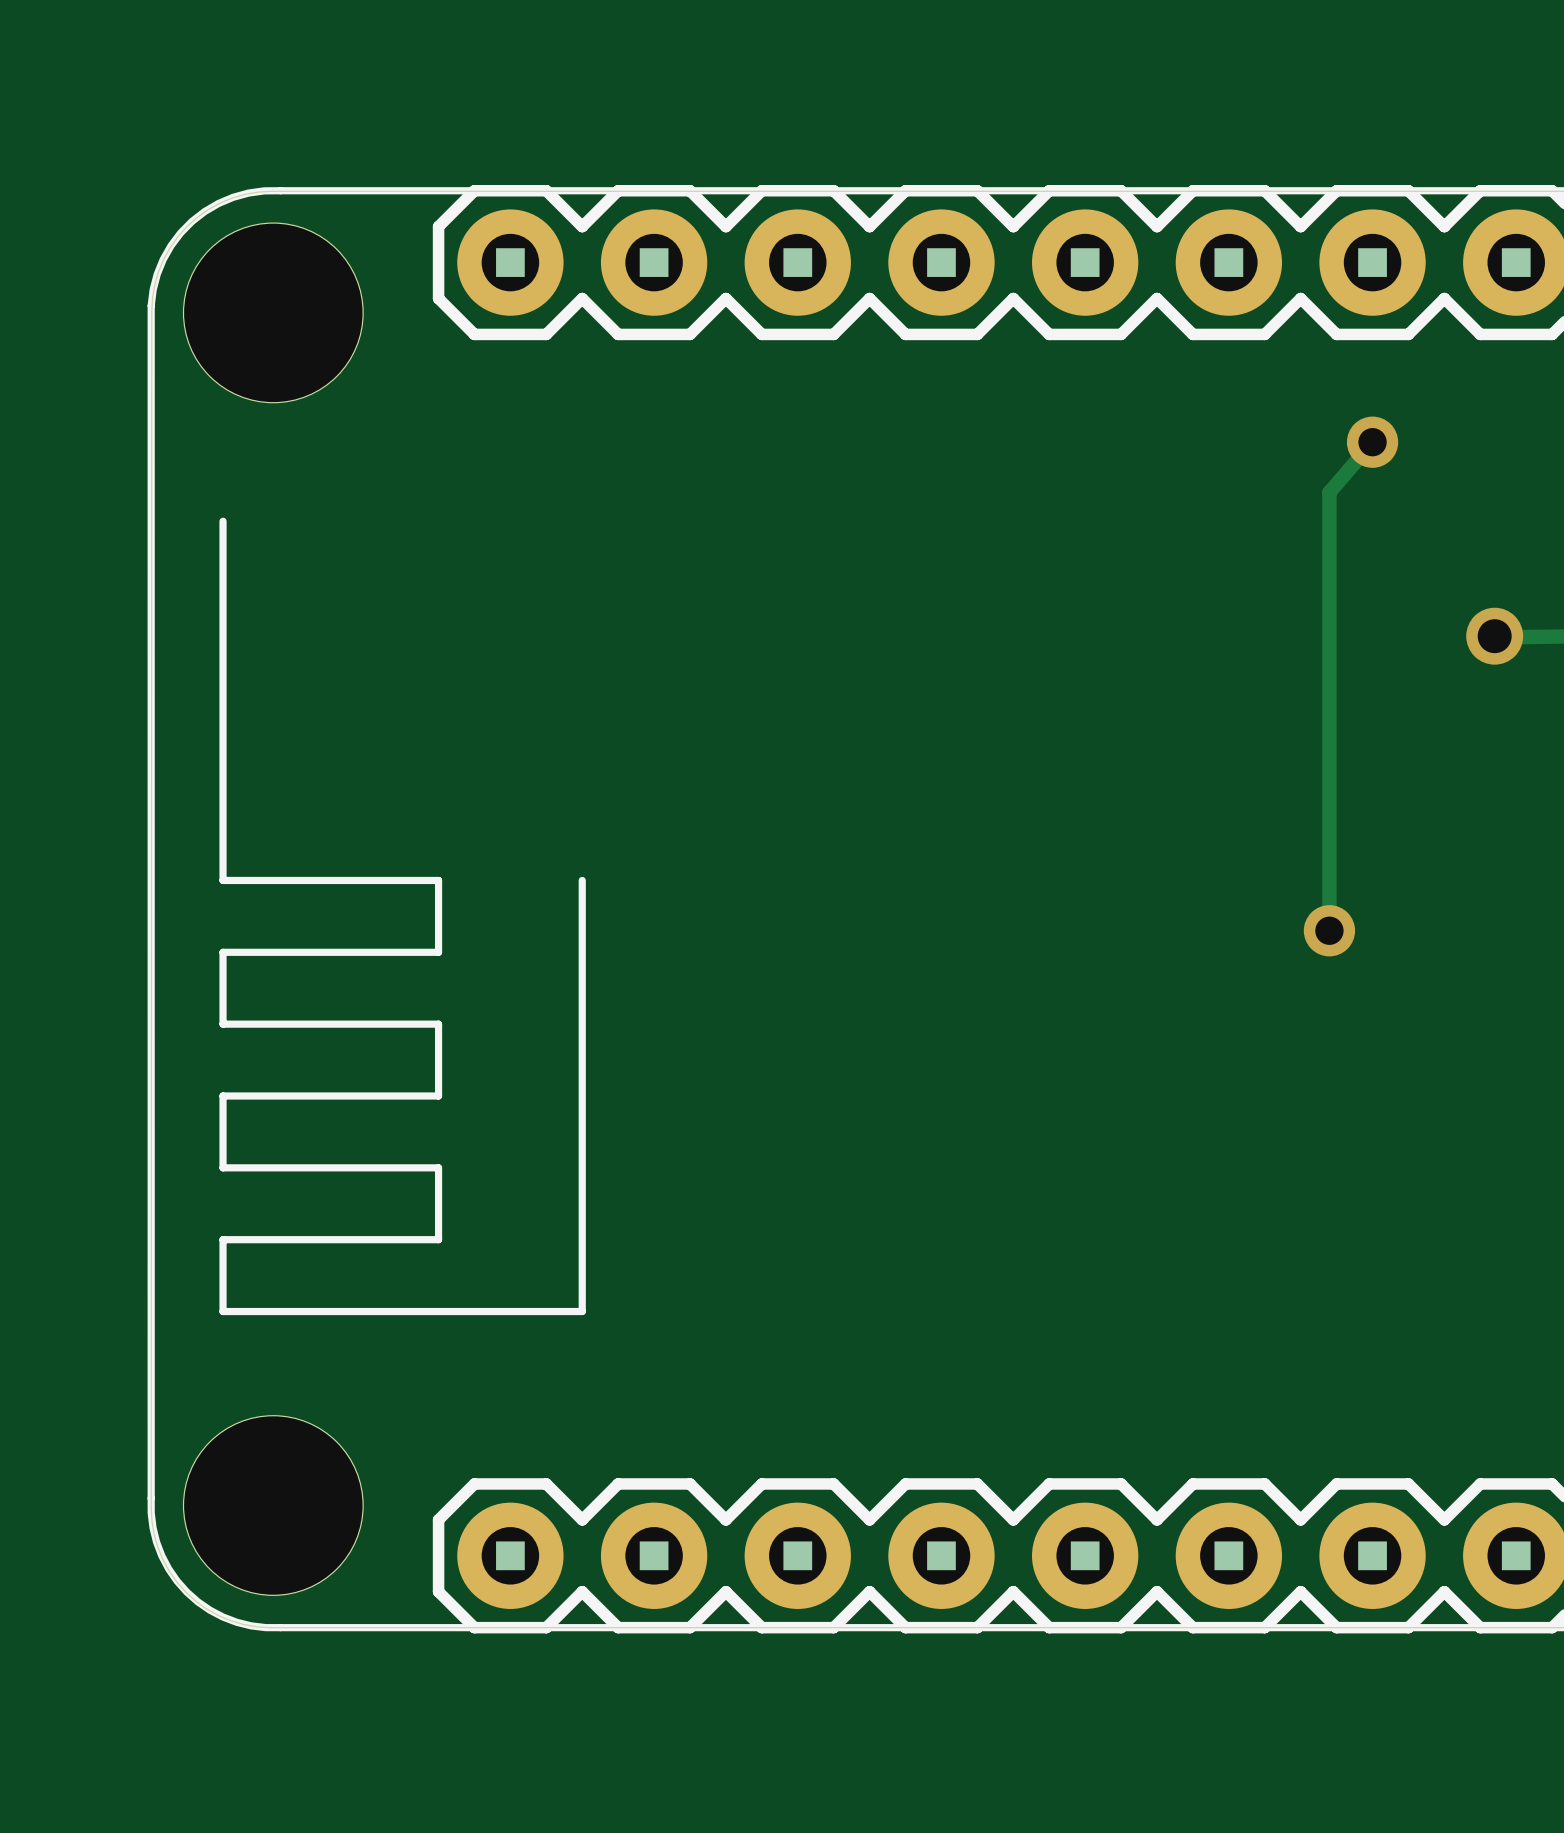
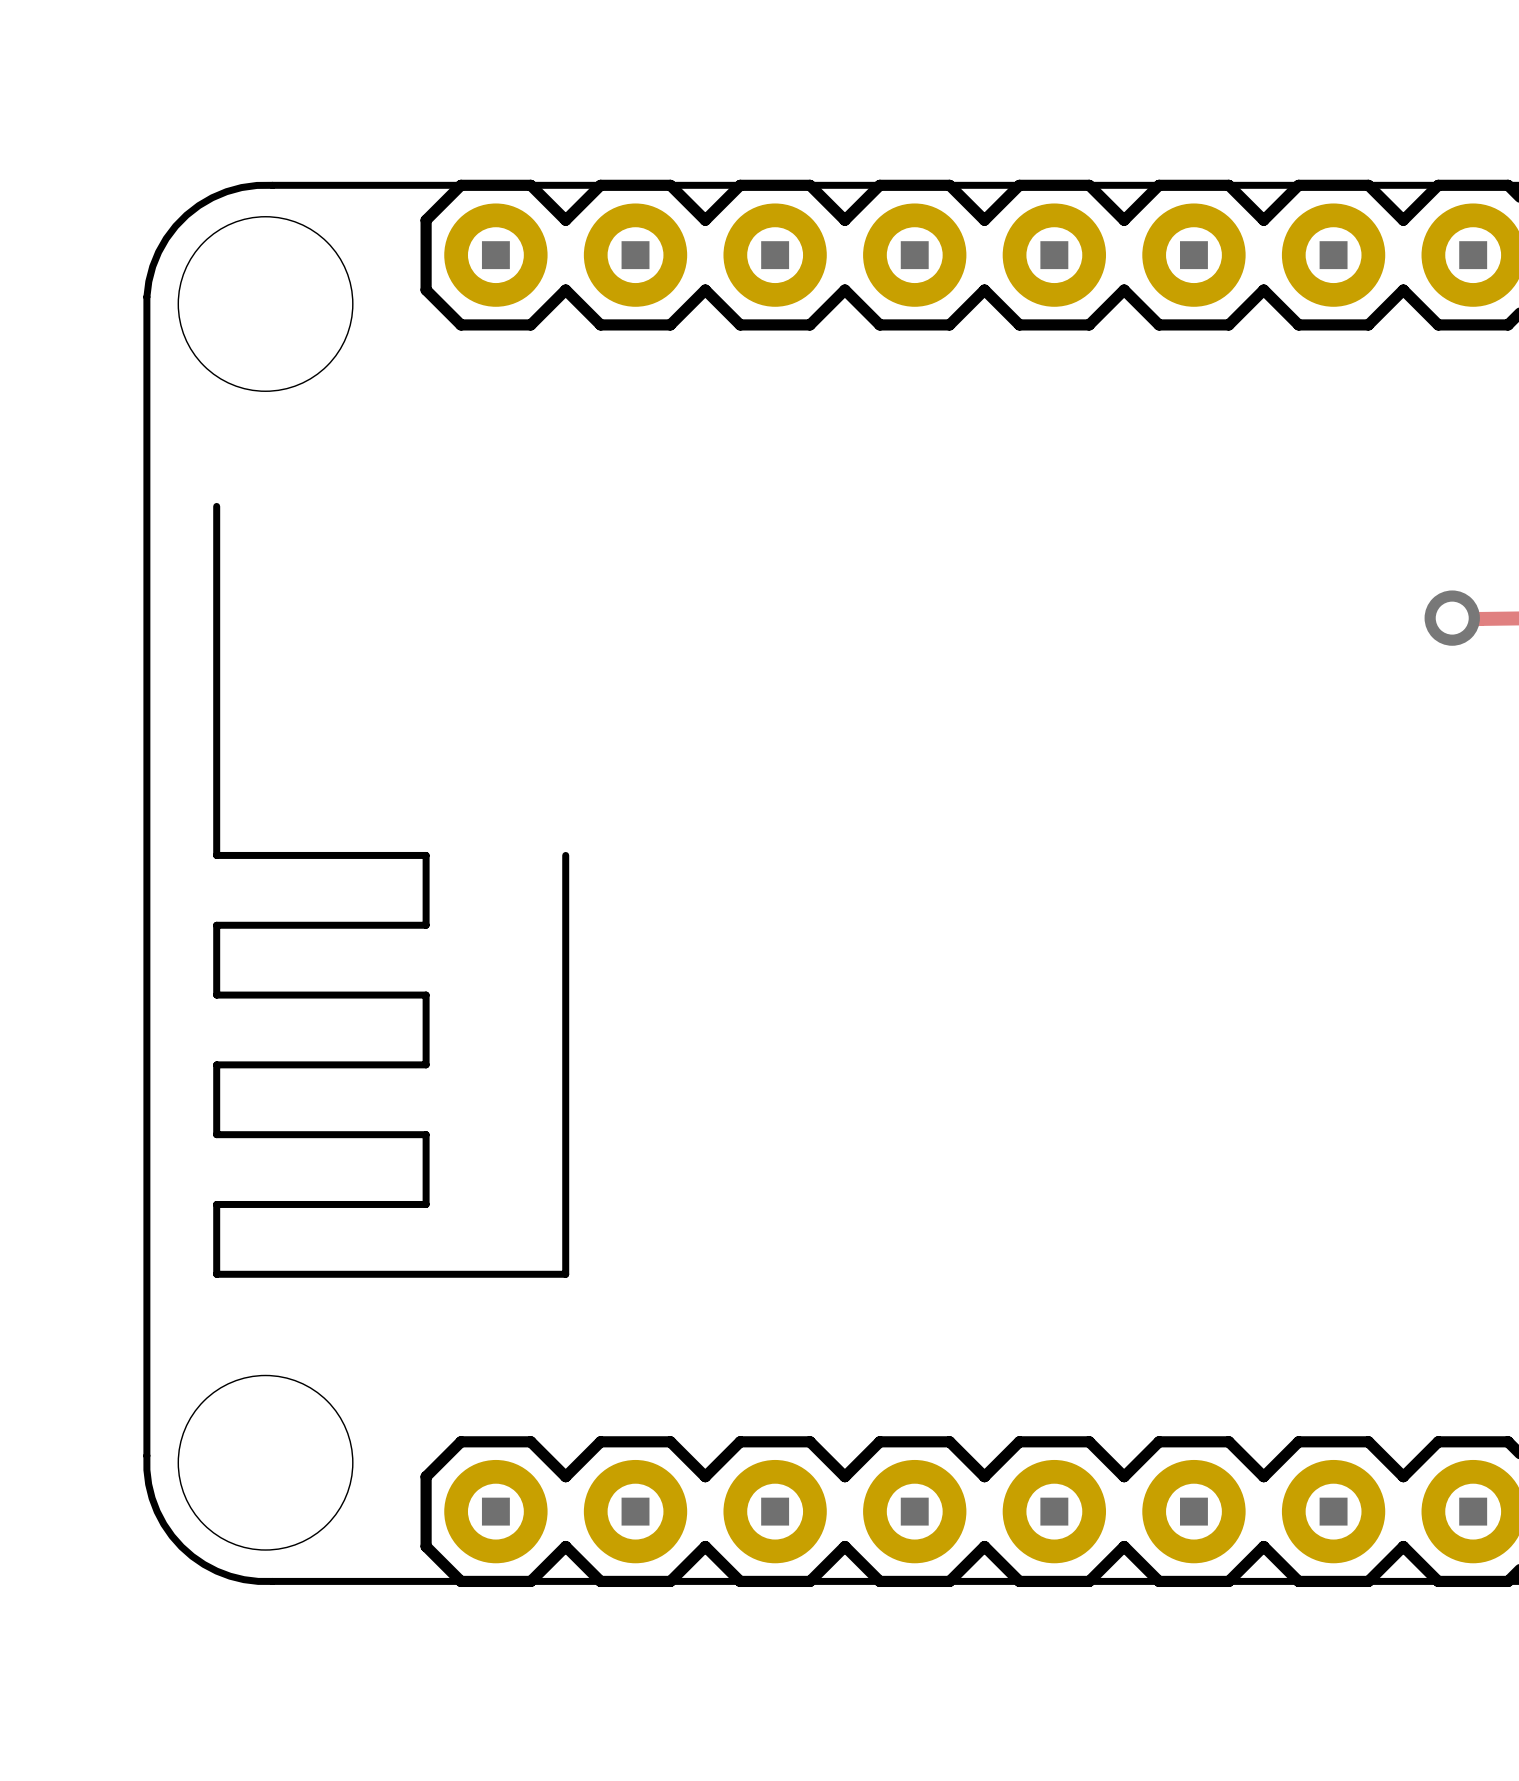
track: (1372, 442) (1329, 492) (1329, 930) -> none
via: (1372, 442) -> none
via: (1329, 930) -> none

